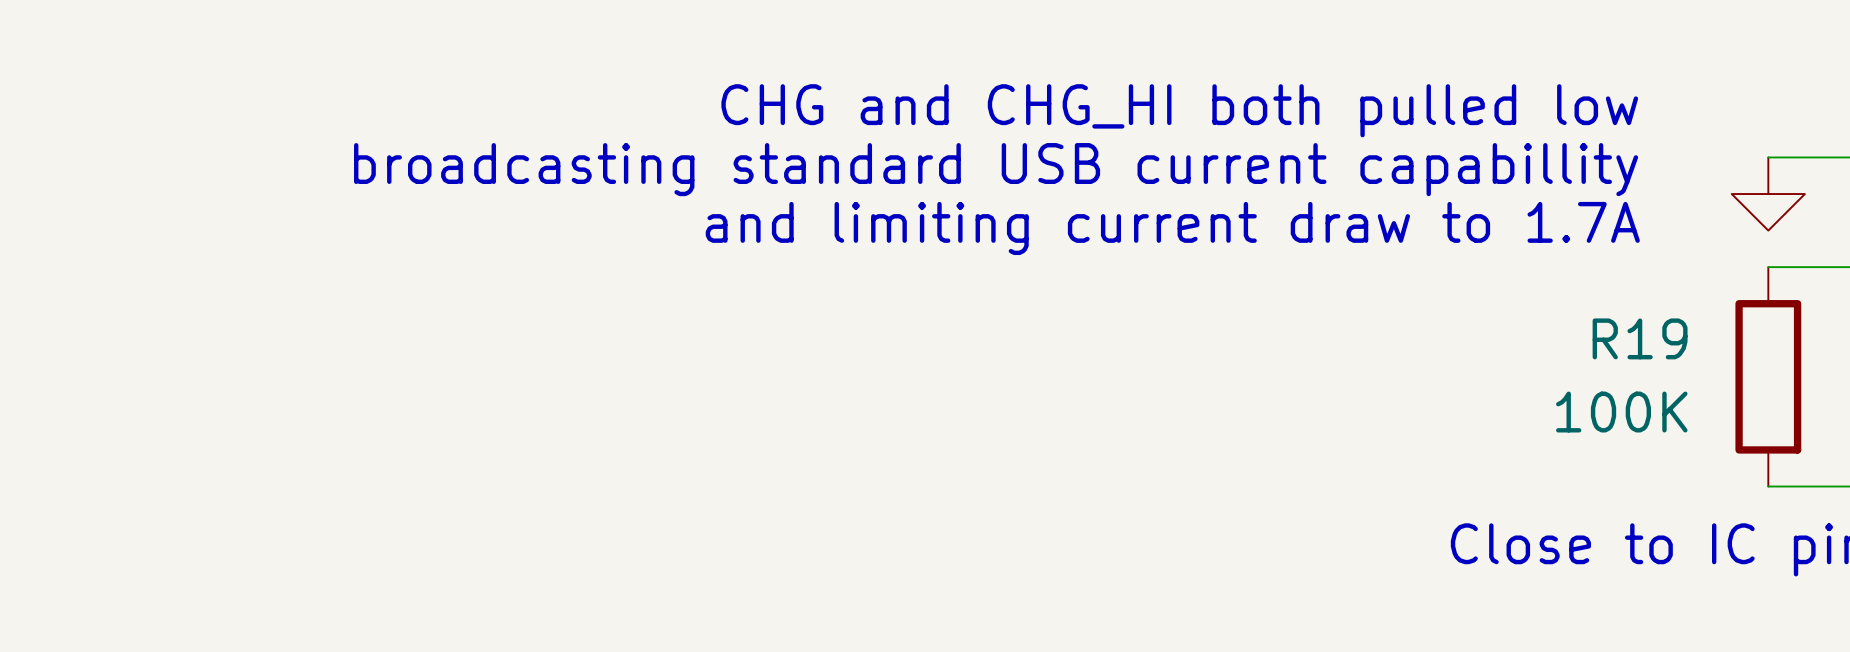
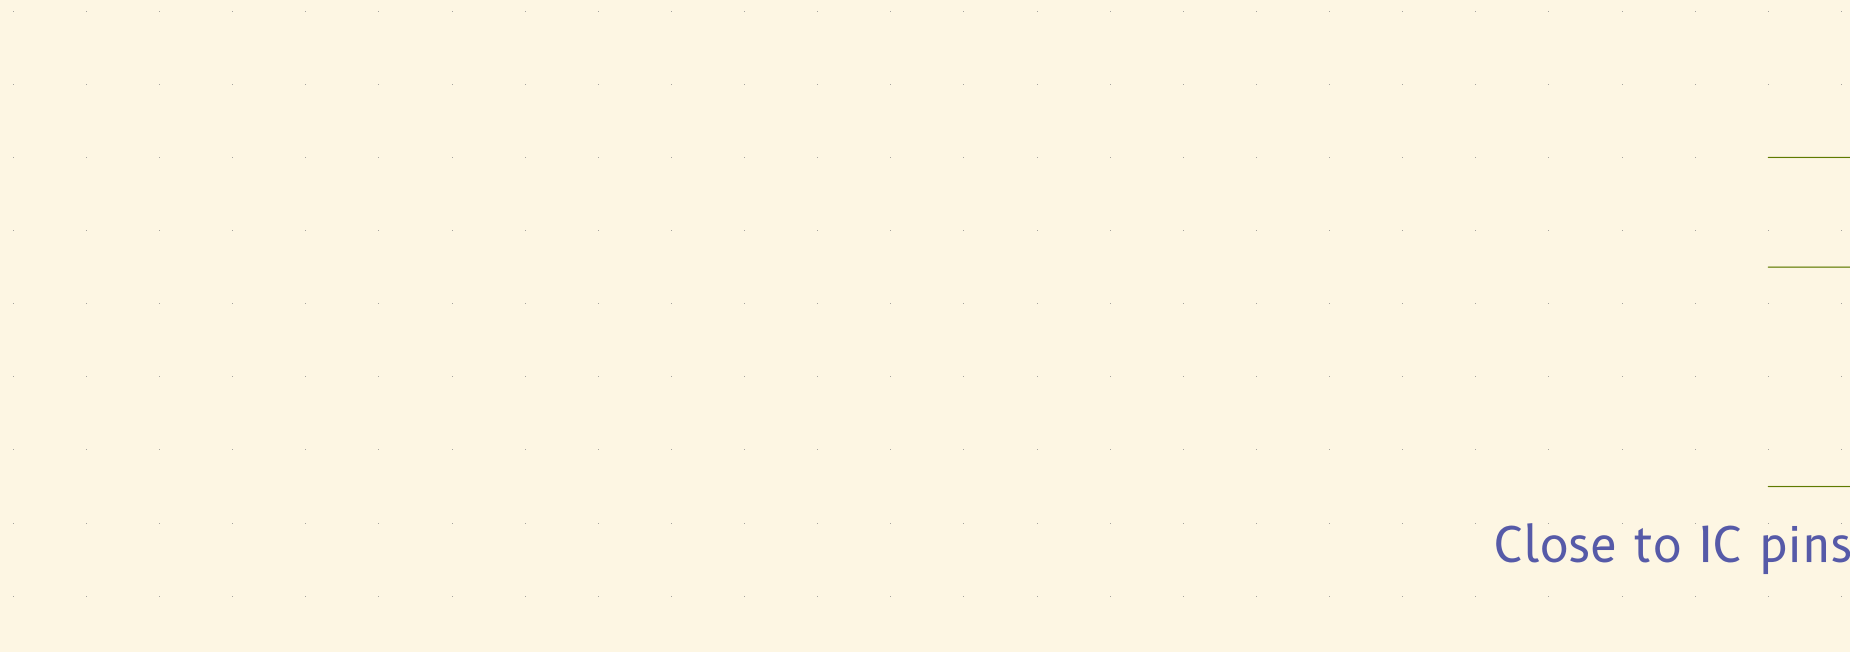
text: CHG and CHG_HI both pulled low (1179, 110) -> none
text: broadcasting standard USB current capabillity (996, 169) -> none
power symbol: (1768, 194) -> none
text: and limiting current draw to 1.7A (1172, 228) -> none
R19: (1768, 376) -> none

